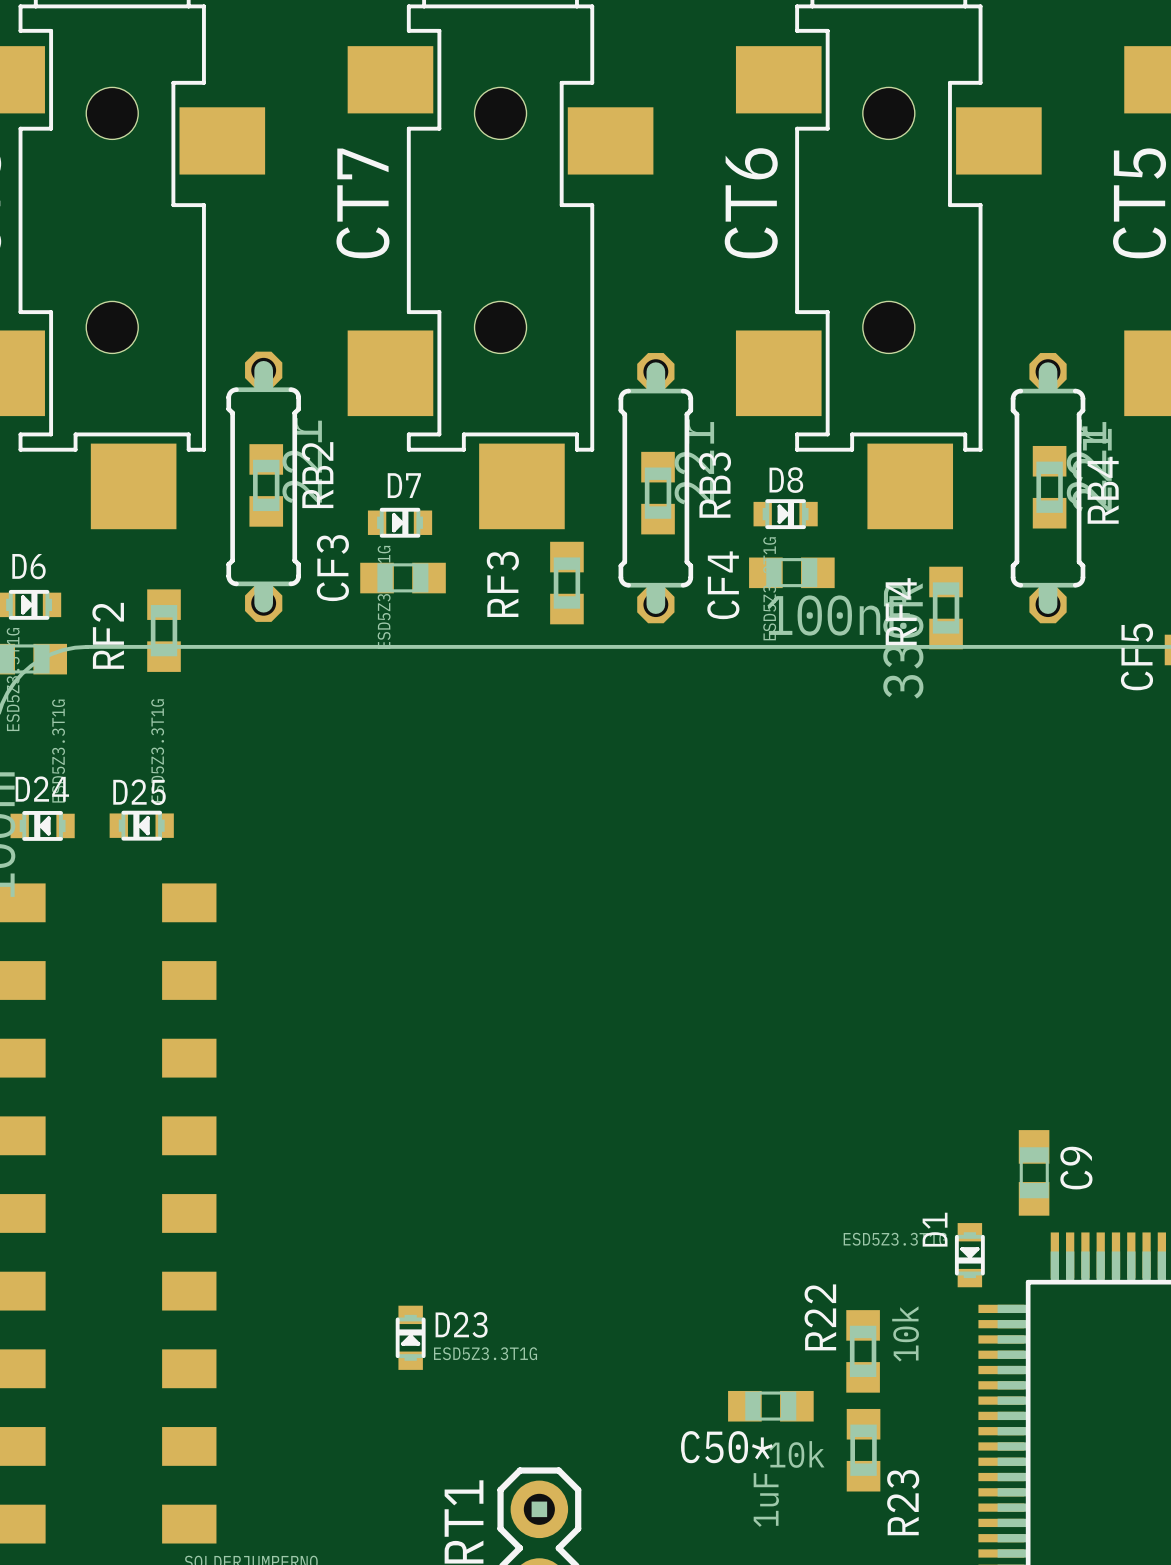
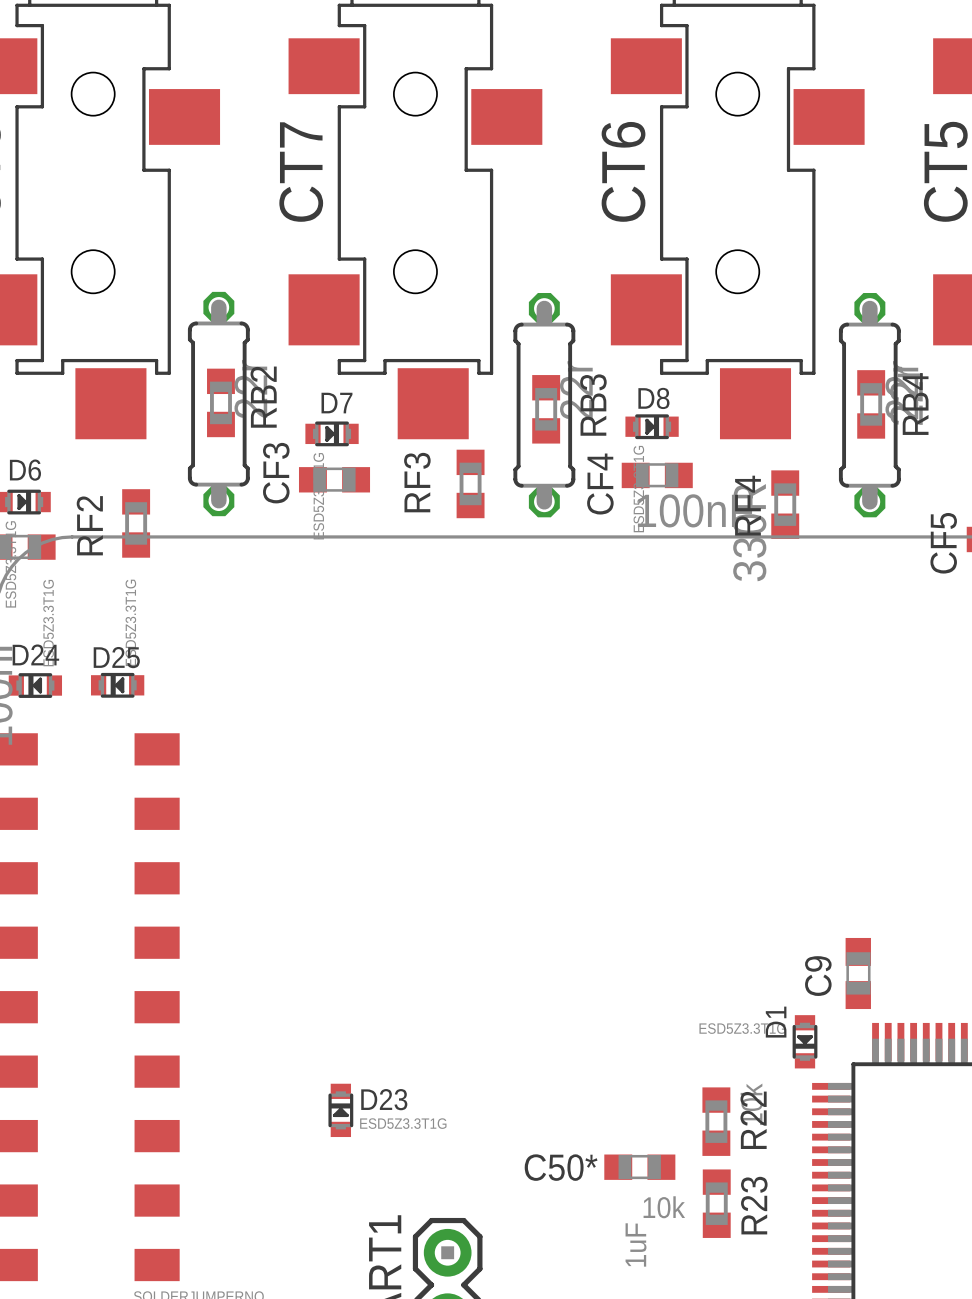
C9 name position: C9 (1076, 1168) -> C9 (818, 976)
R22 name position: R22 (820, 1317) -> R22 (753, 1120)
C50* name position: C50* (726, 1447) -> C50* (561, 1167)
R23 name position: R23 (903, 1502) -> R23 (754, 1205)

